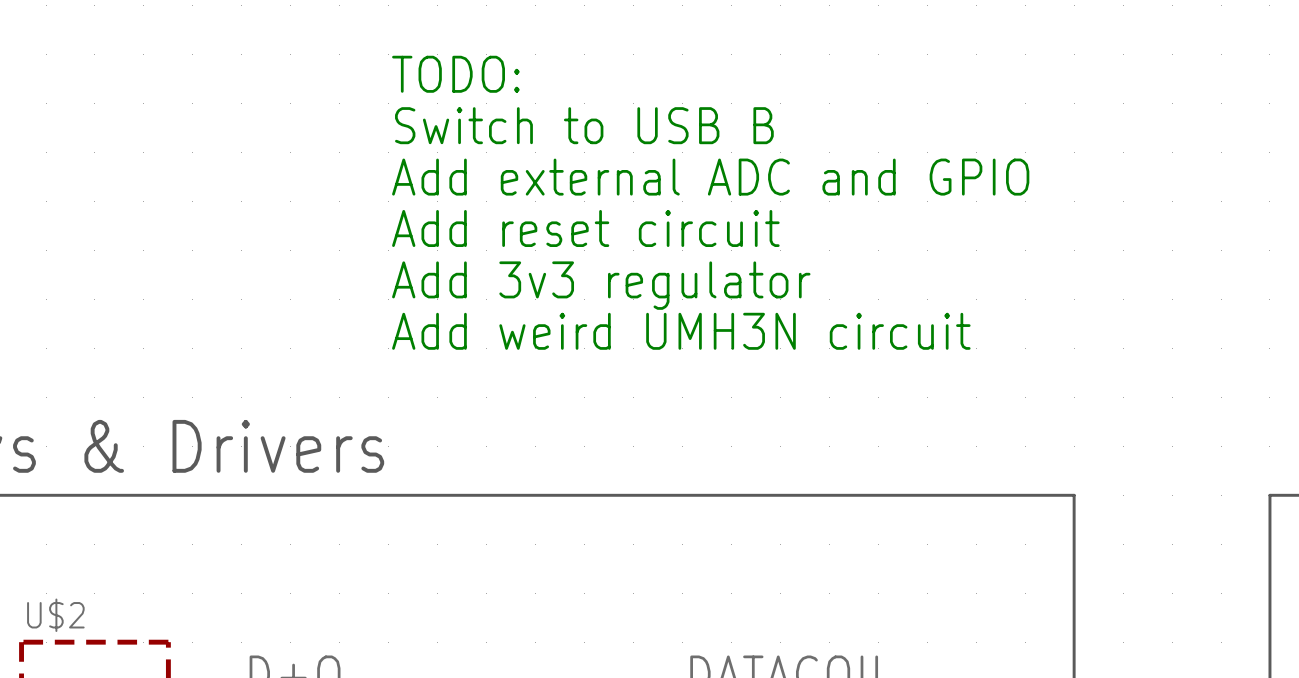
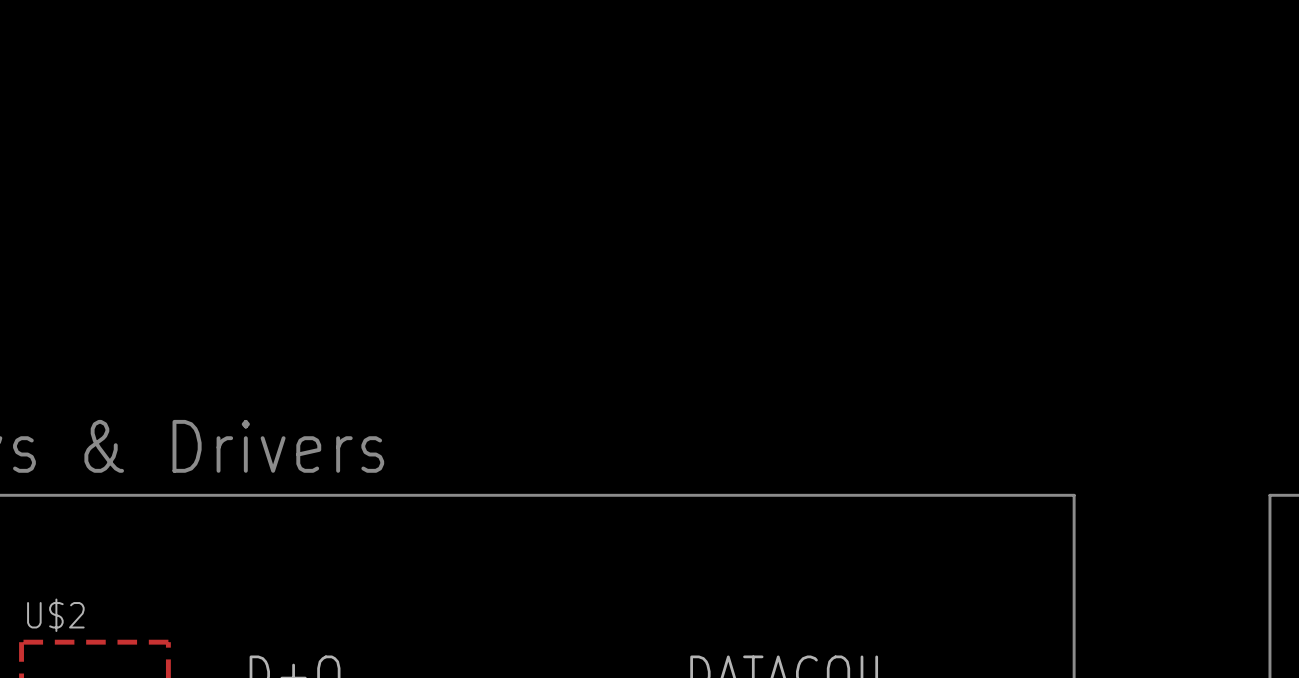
text: TODO: (455, 74) -> none
text: Switch to USB B (584, 125) -> none
text: Add external ADC and GPIO (710, 177) -> none
text: Add reset circuit (585, 228) -> none
text: Add 3v3 regulator (601, 285) -> none
text: Add weird UMH3N circuit (681, 331) -> none

